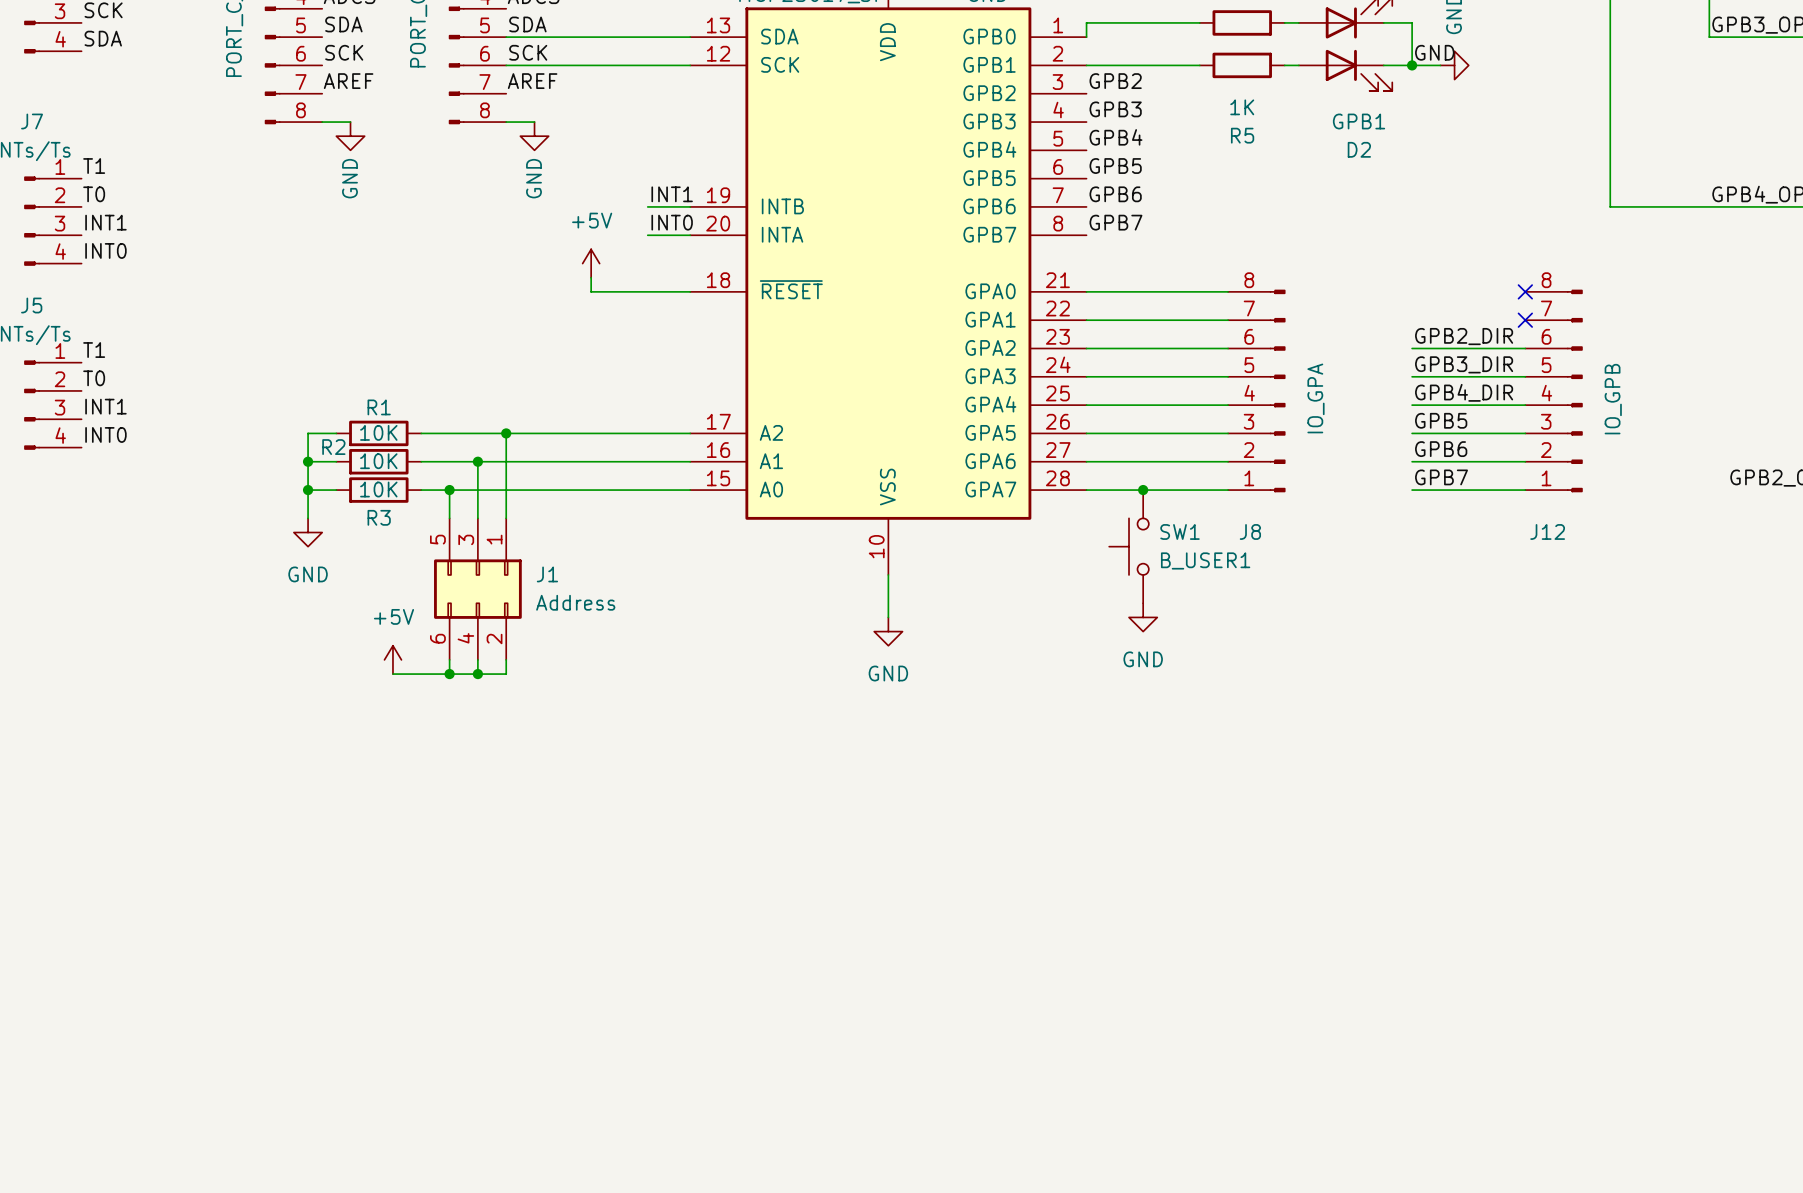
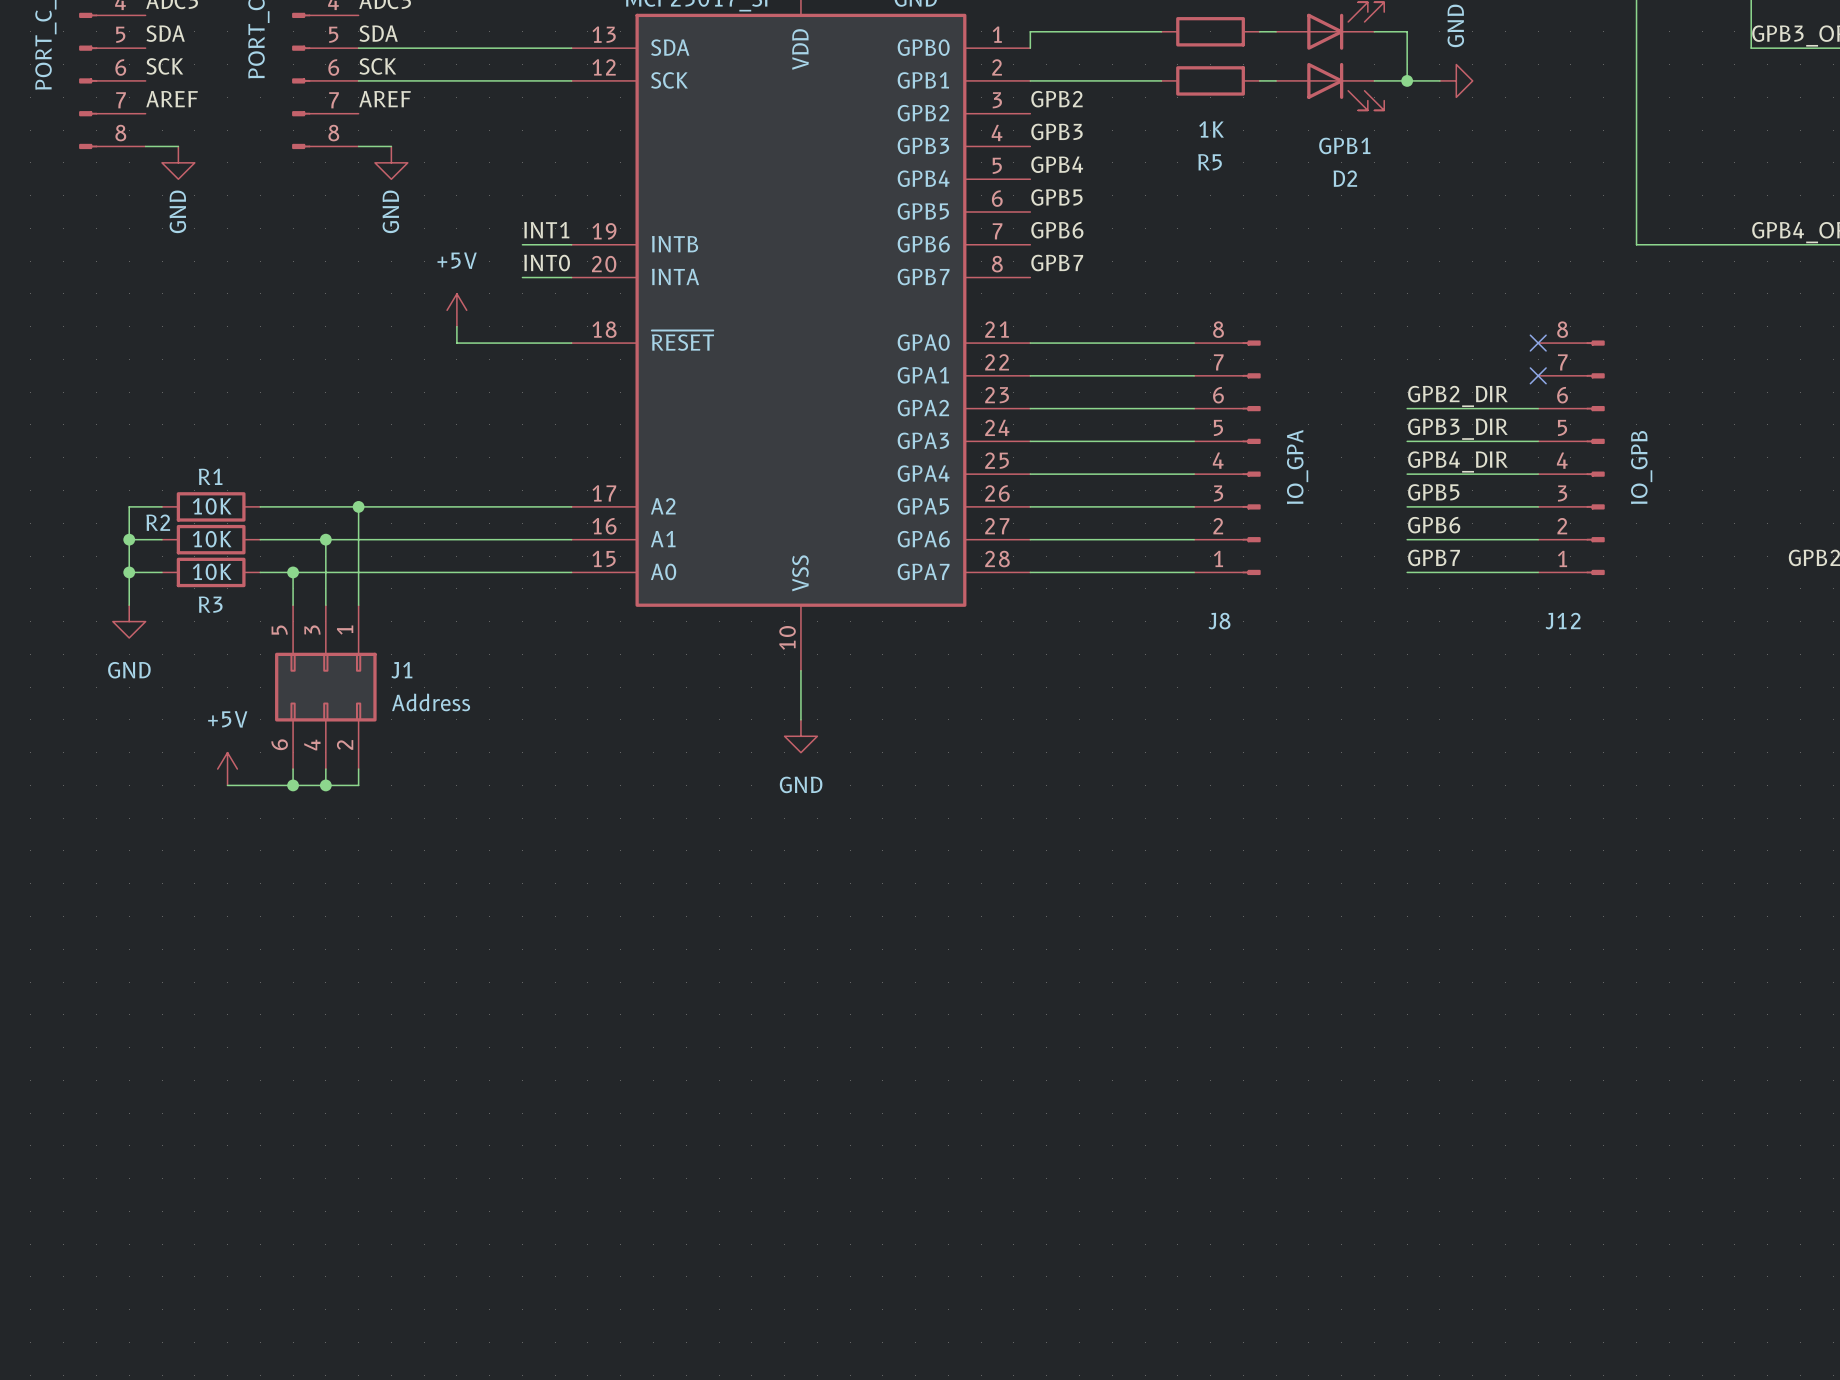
label: GND (1434, 52) -> none
junction: (1143, 490) -> none
SW1: B_USER1 (1129, 546) -> none
power symbol: GND (1143, 617) -> none

